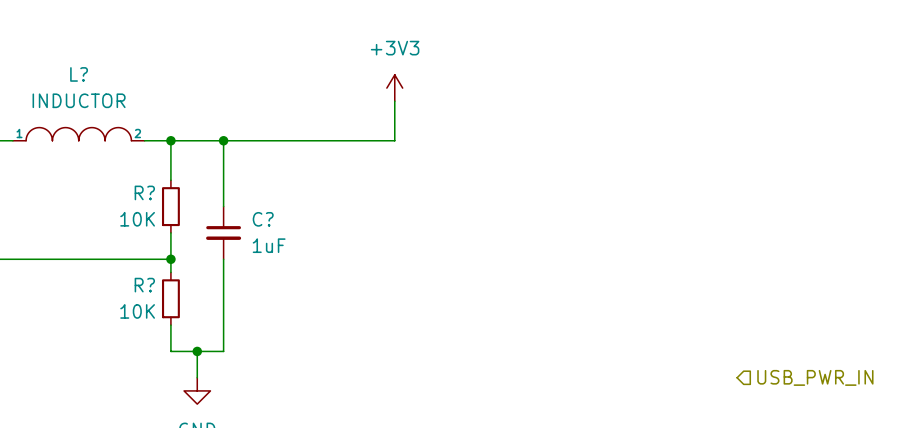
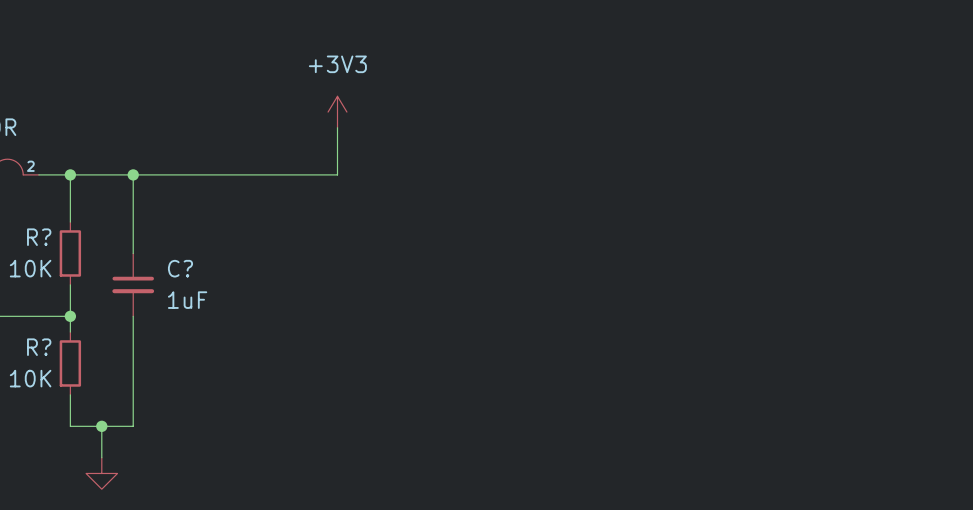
hierarchical label: USB_PWR_IN (815, 377) -> none

